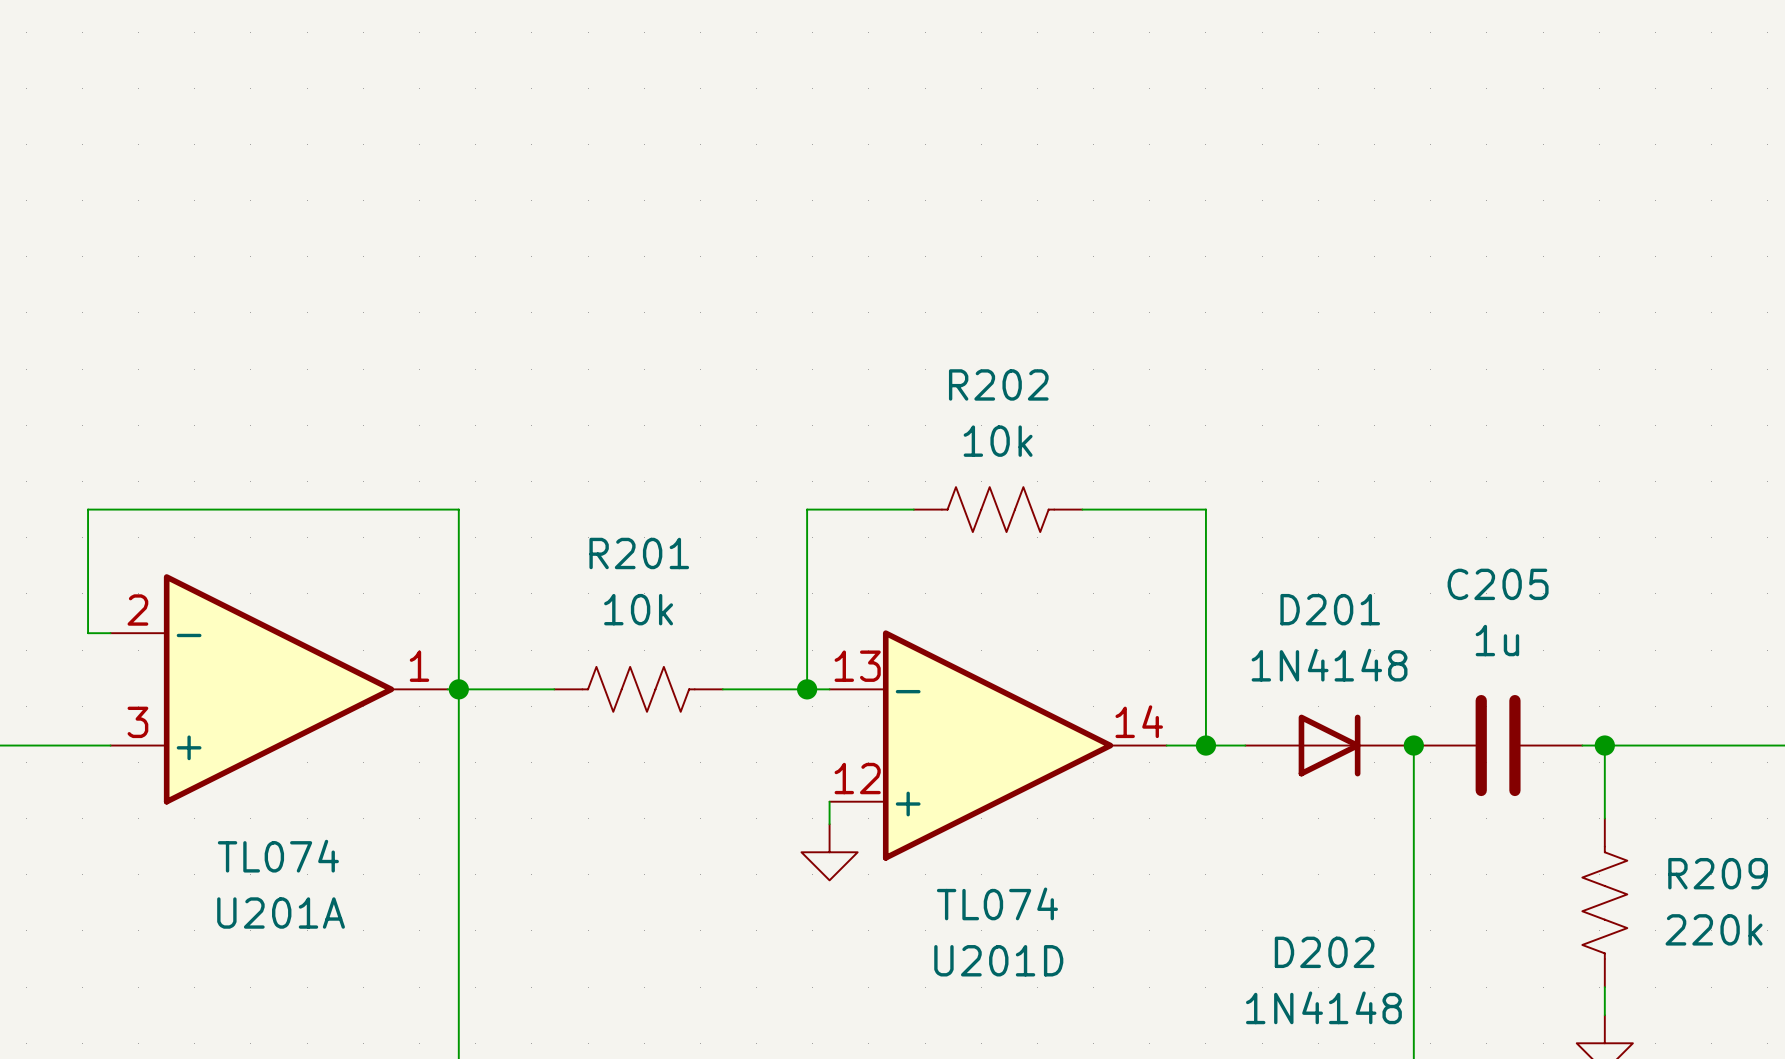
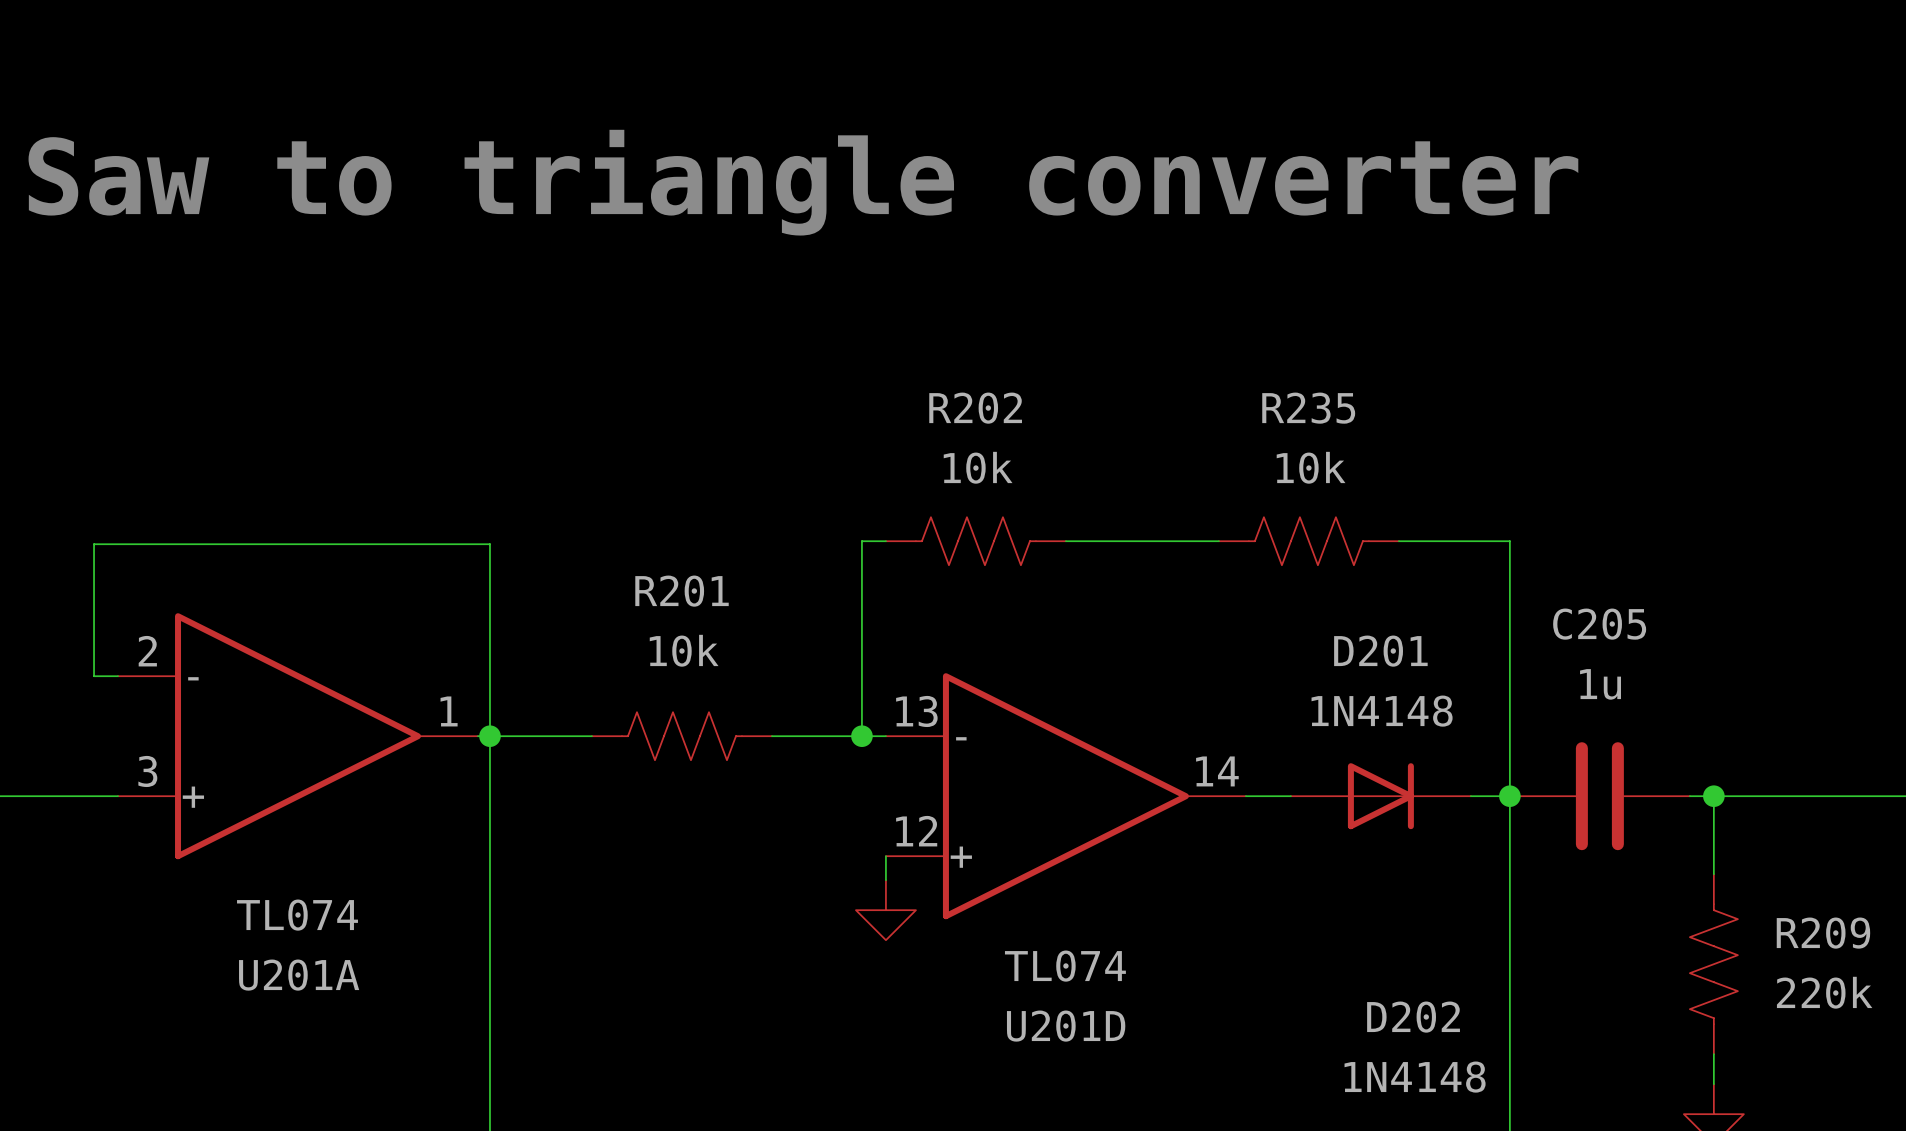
text: none -> Saw to triangle converter (803, 182)
wire: none -> (1065, 541) (1218, 541)
R235: none -> 10k (1308, 541)
wire: none -> (1398, 541) (1509, 541) (1509, 796) (1470, 796)
wire: (807, 509) (913, 509) -> (861, 544) (861, 541) (885, 541)
R202 position: (998, 509) -> (975, 541)
wire: (1082, 509) (1205, 509) (1205, 745) -> none
junction: (1205, 745) -> none
D201 position: (1329, 745) -> (1380, 796)

